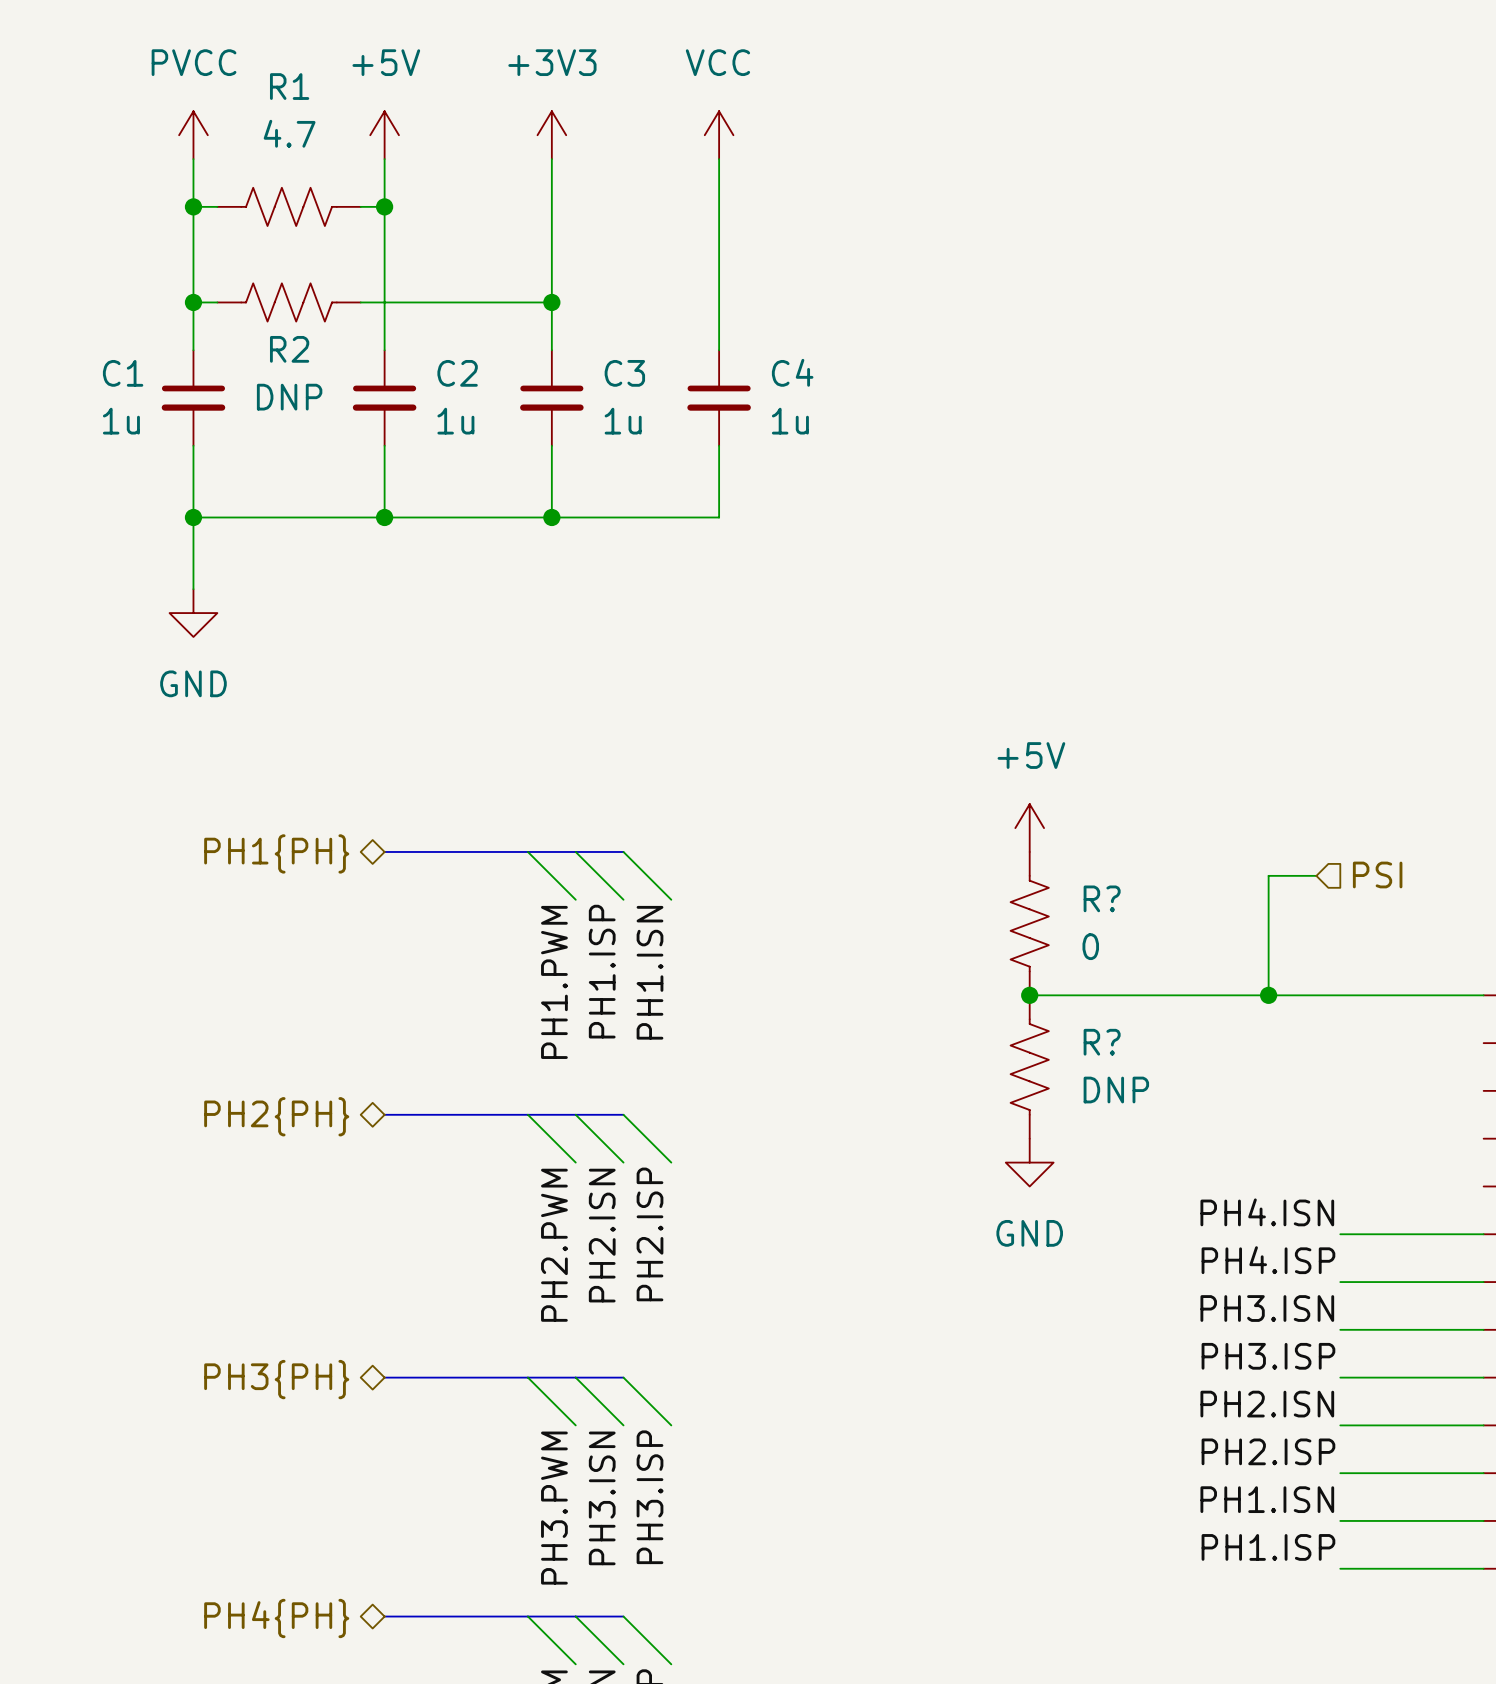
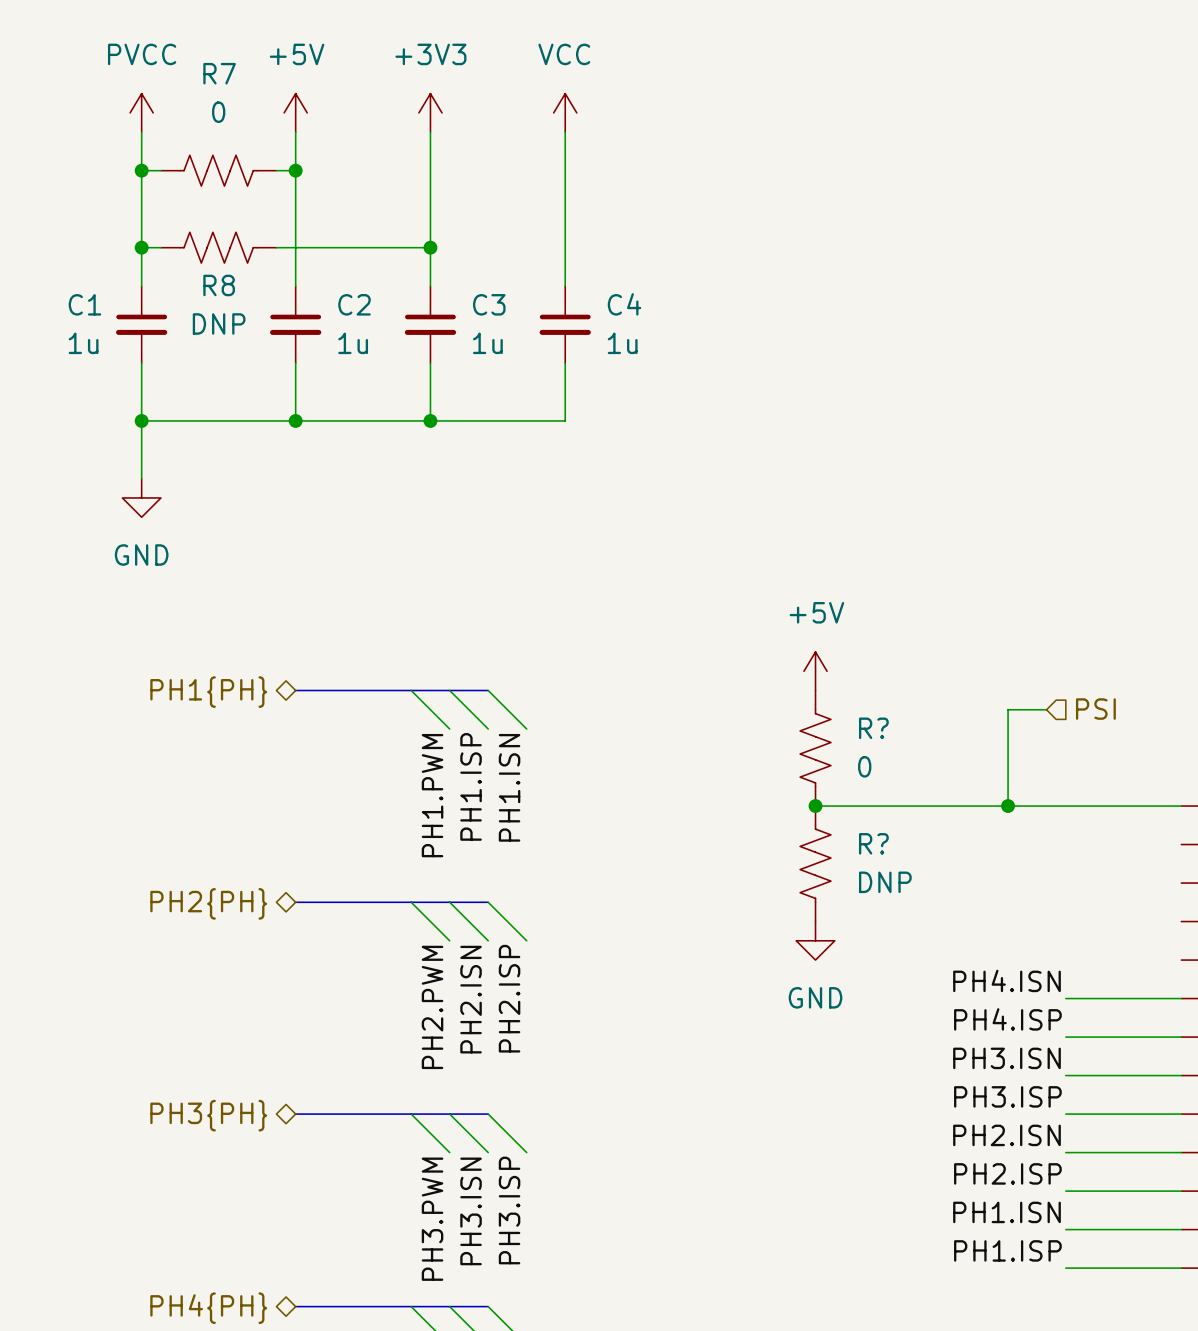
R1 name: R1 (289, 86) -> R7 (219, 73)
R1 value: 4.7 (289, 133) -> 0 (218, 112)
R2 name: R2 (289, 349) -> R8 (219, 285)

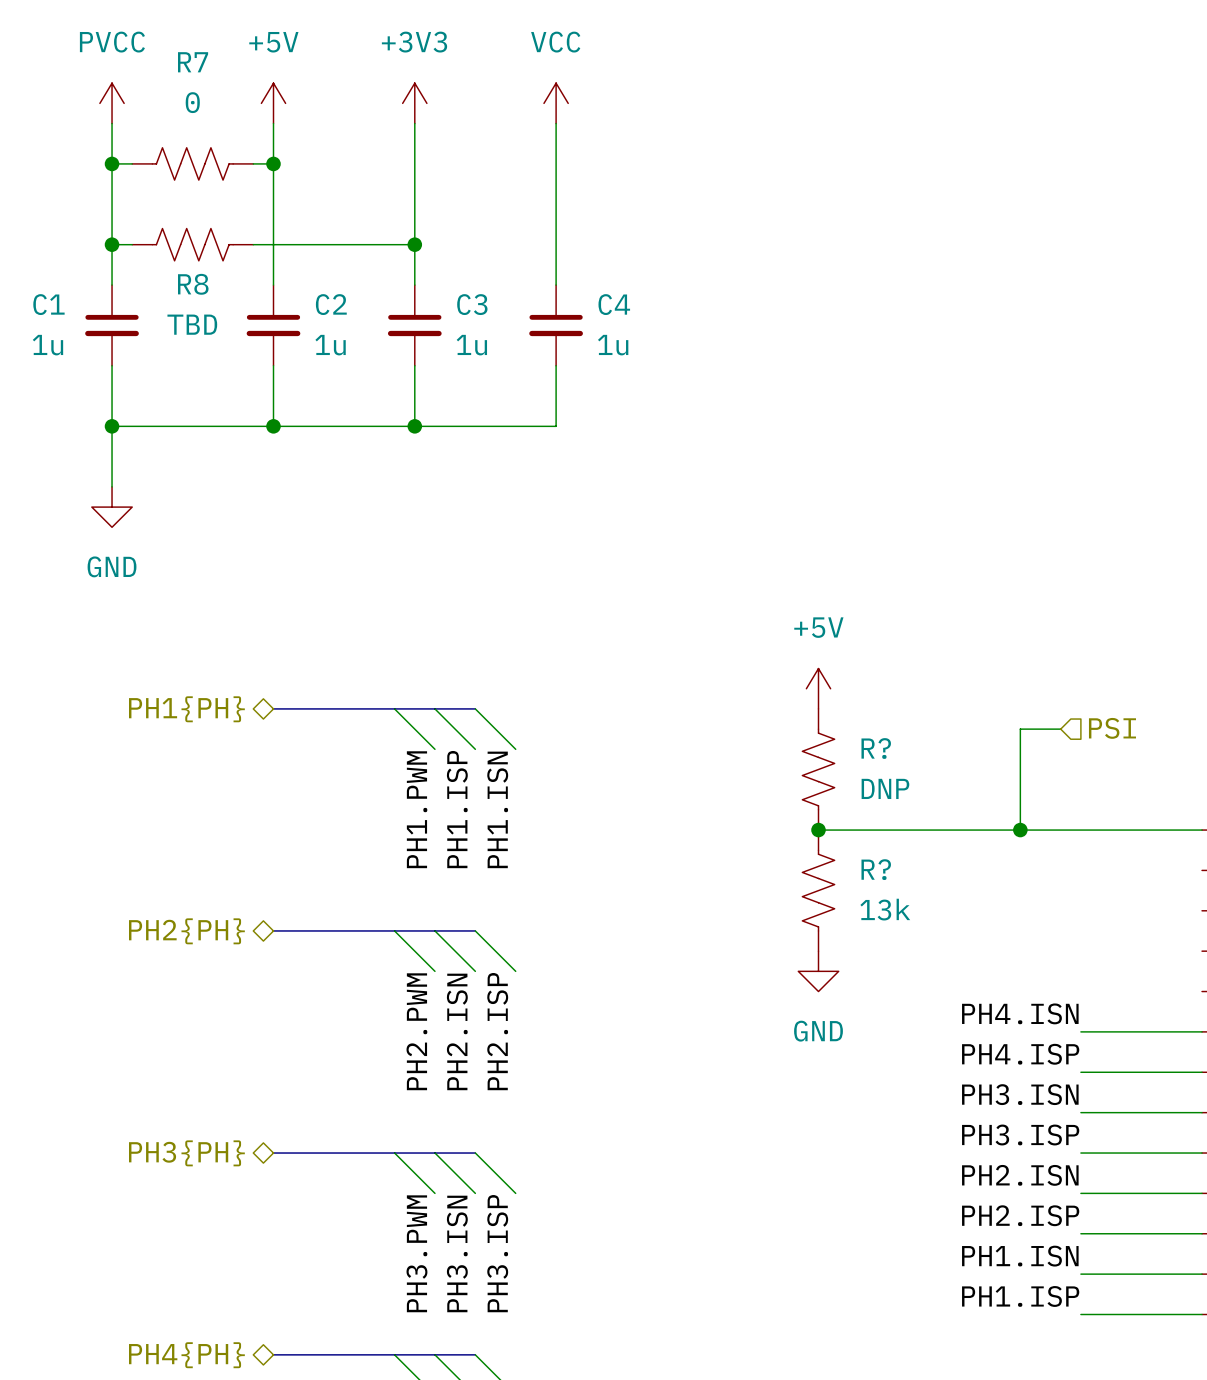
R8 value: DNP (219, 323) -> TBD (192, 324)
R? value: 0 (864, 766) -> DNP (885, 788)
R? value: DNP (885, 882) -> 13k (885, 909)

